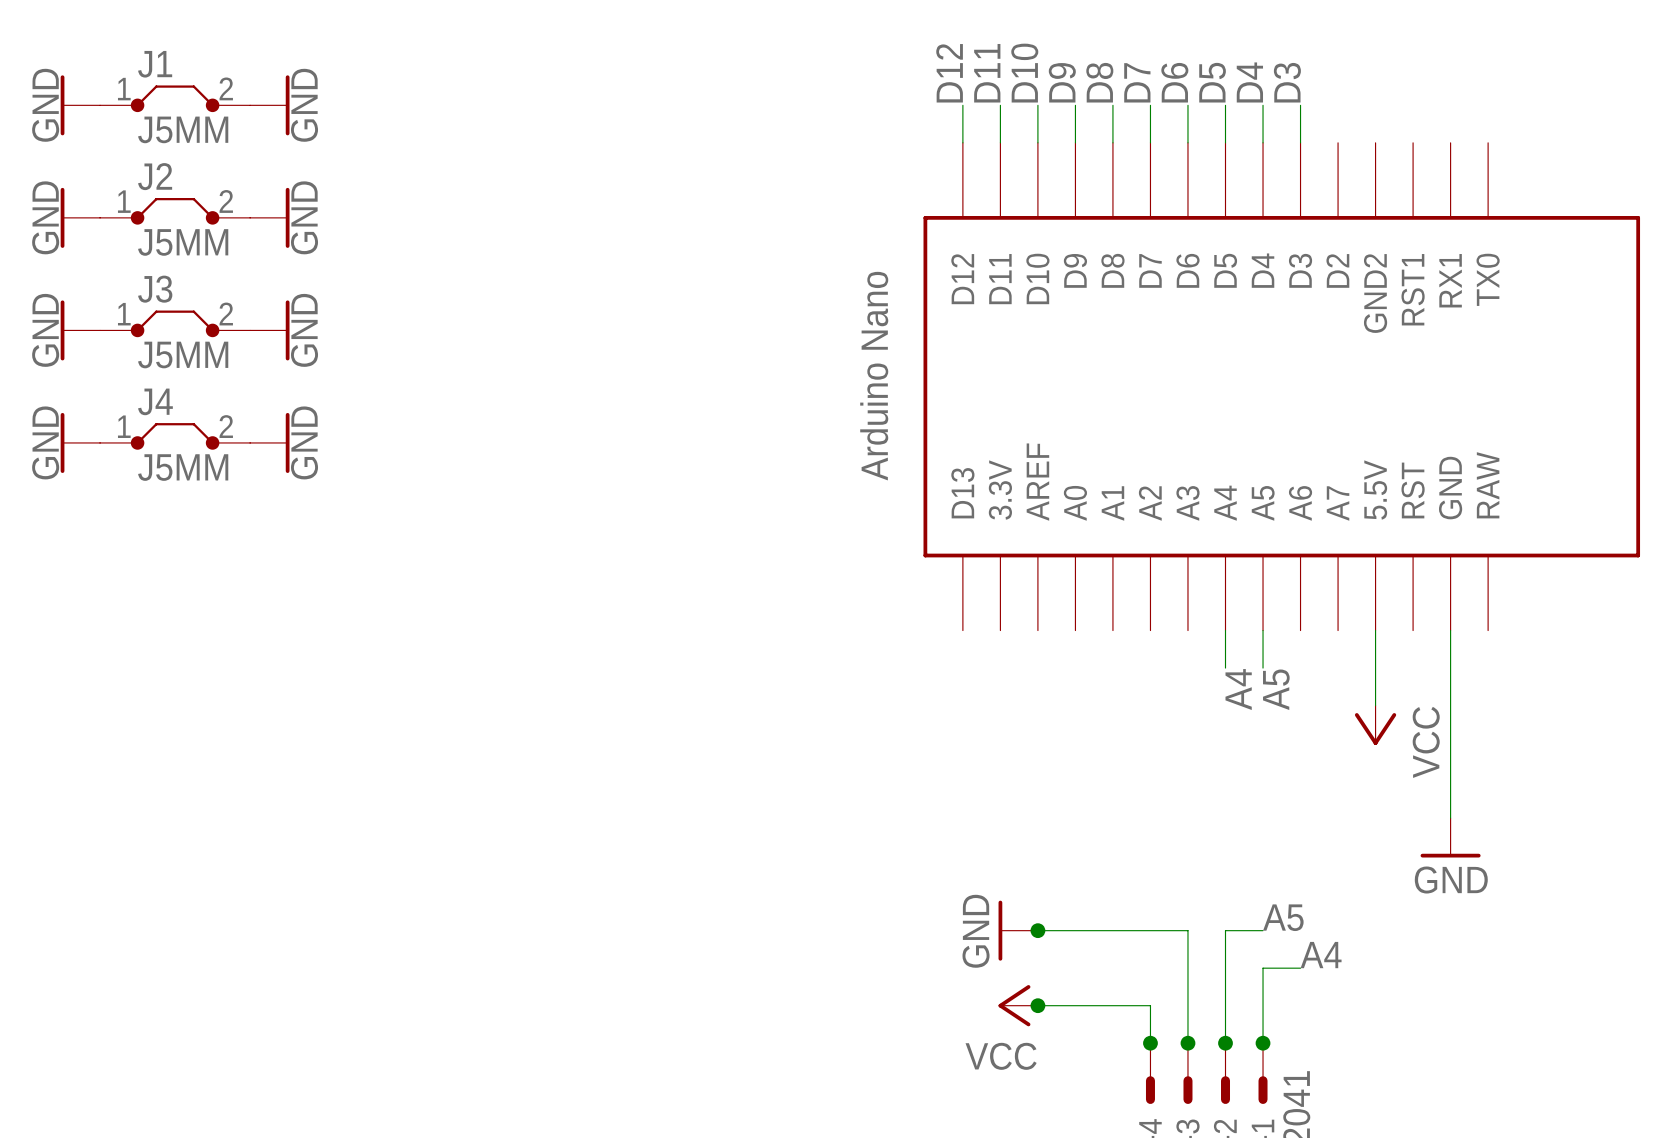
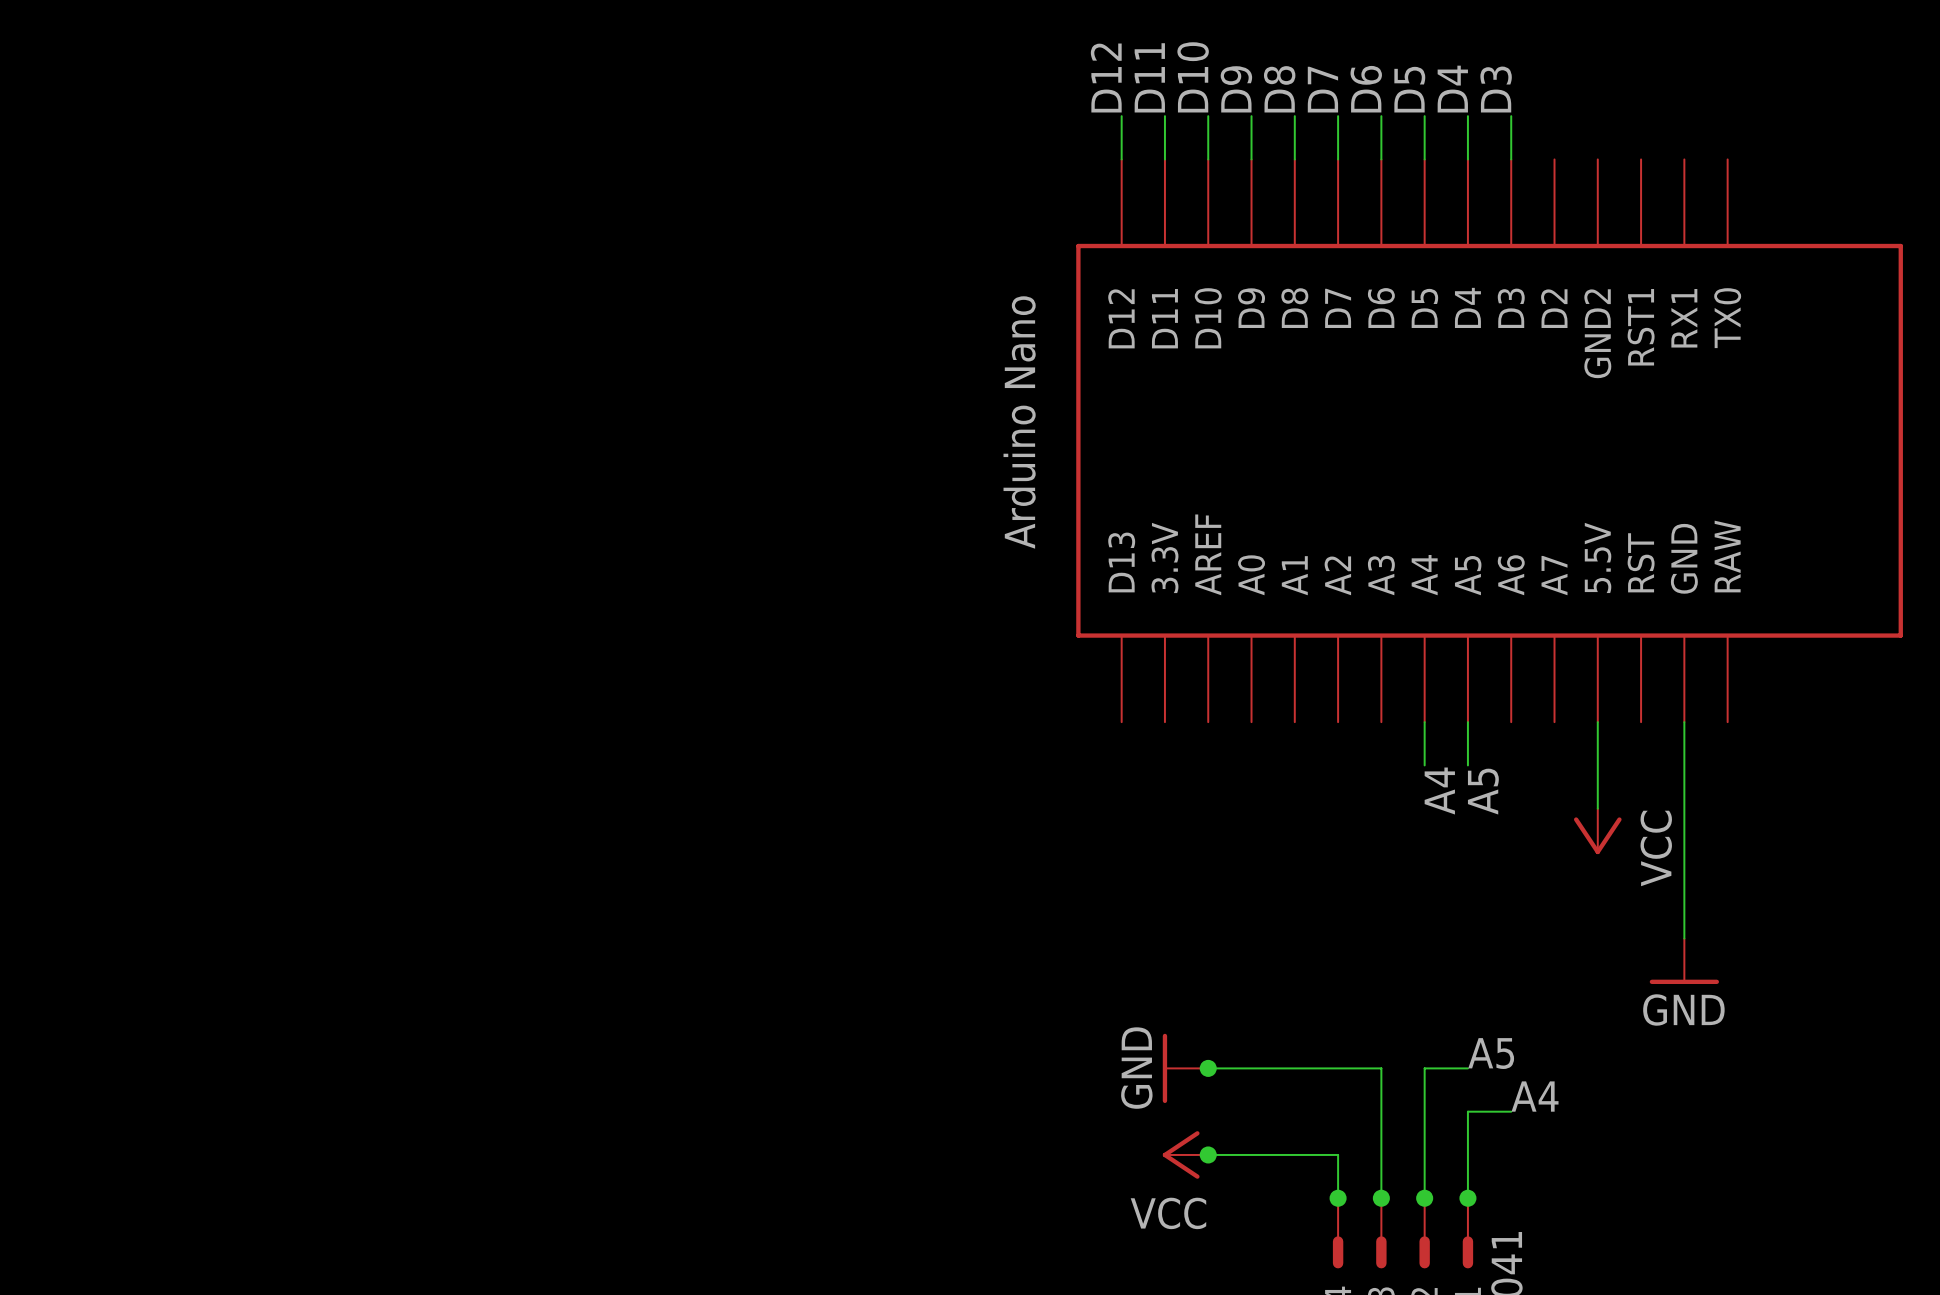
J1: J5MM (175, 98) -> none
power symbol: GND (80, 105) -> none
power symbol: GND (269, 105) -> none
J2: J5MM (175, 211) -> none
power symbol: GND (80, 217) -> none
power symbol: GND (269, 217) -> none
J3: J5MM (175, 323) -> none
power symbol: GND (80, 330) -> none
power symbol: GND (269, 330) -> none
J4: J5MM (175, 436) -> none
power symbol: GND (80, 442) -> none
power symbol: GND (269, 442) -> none

